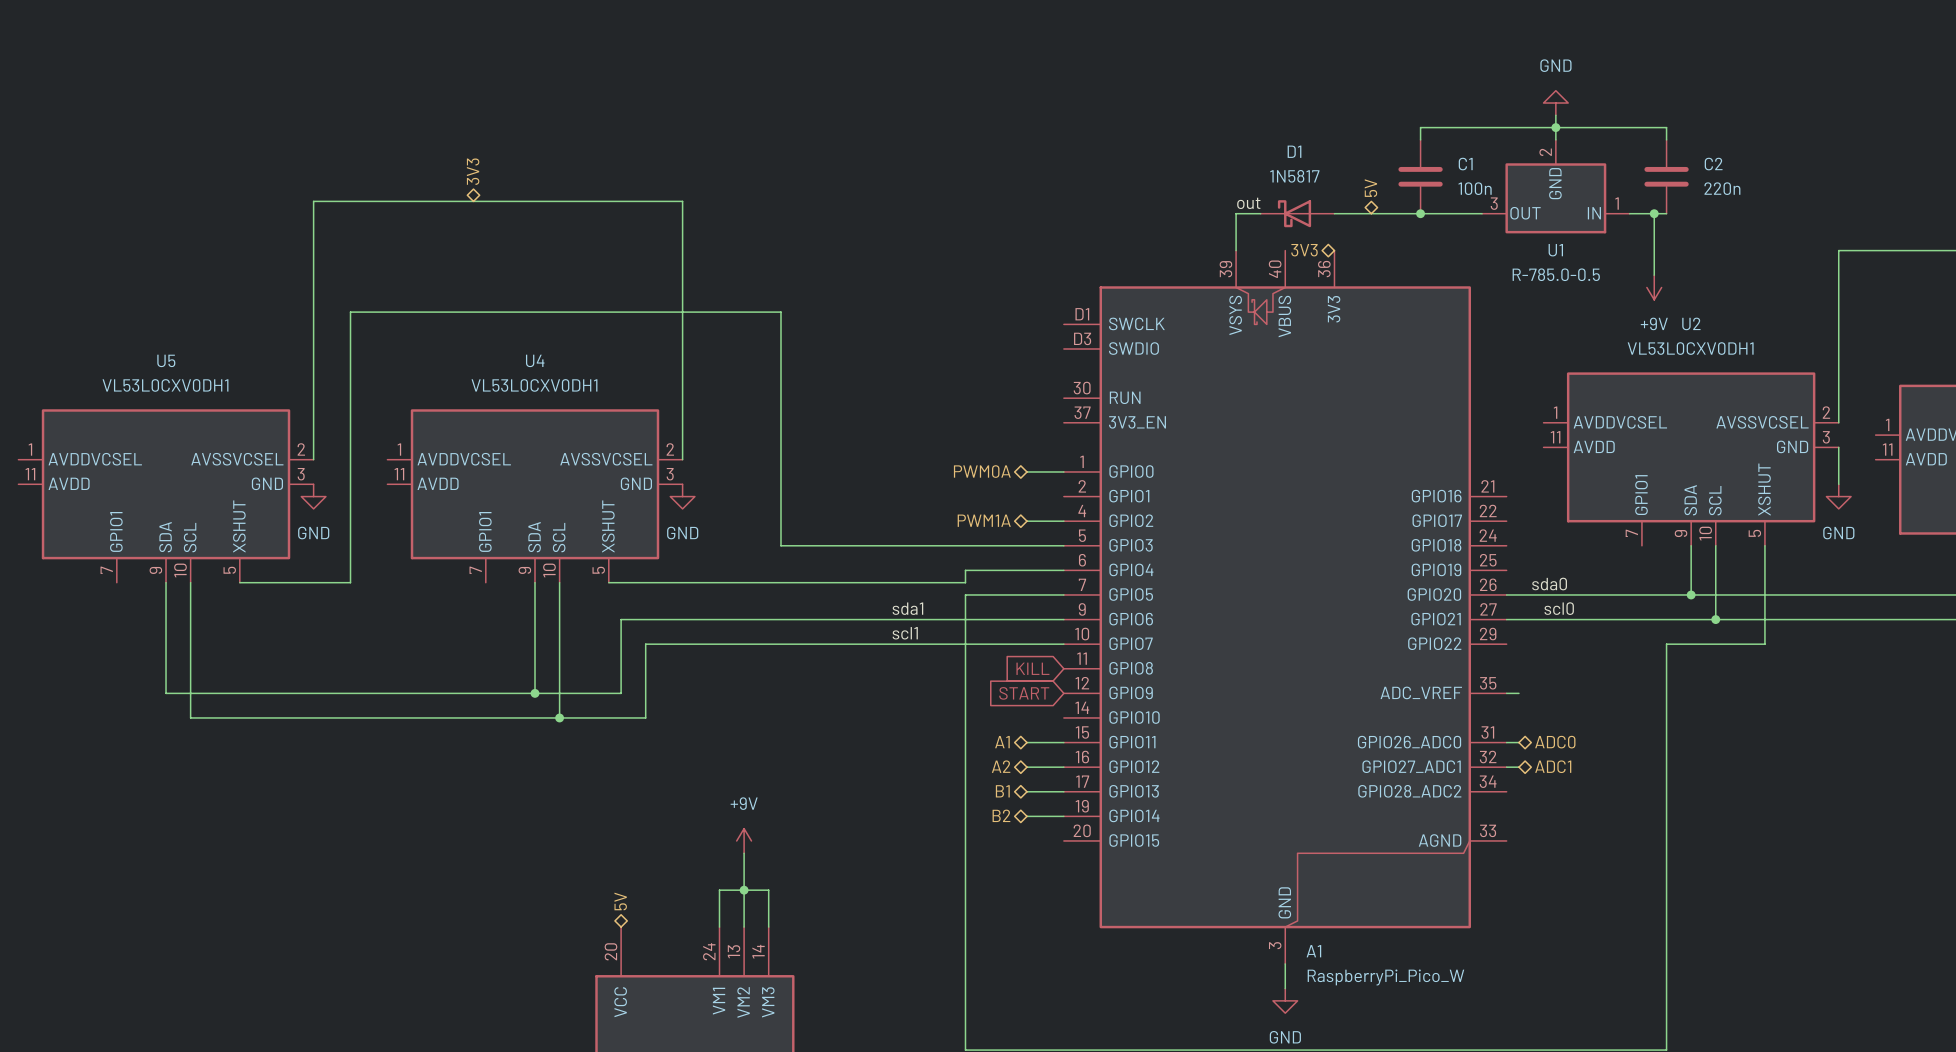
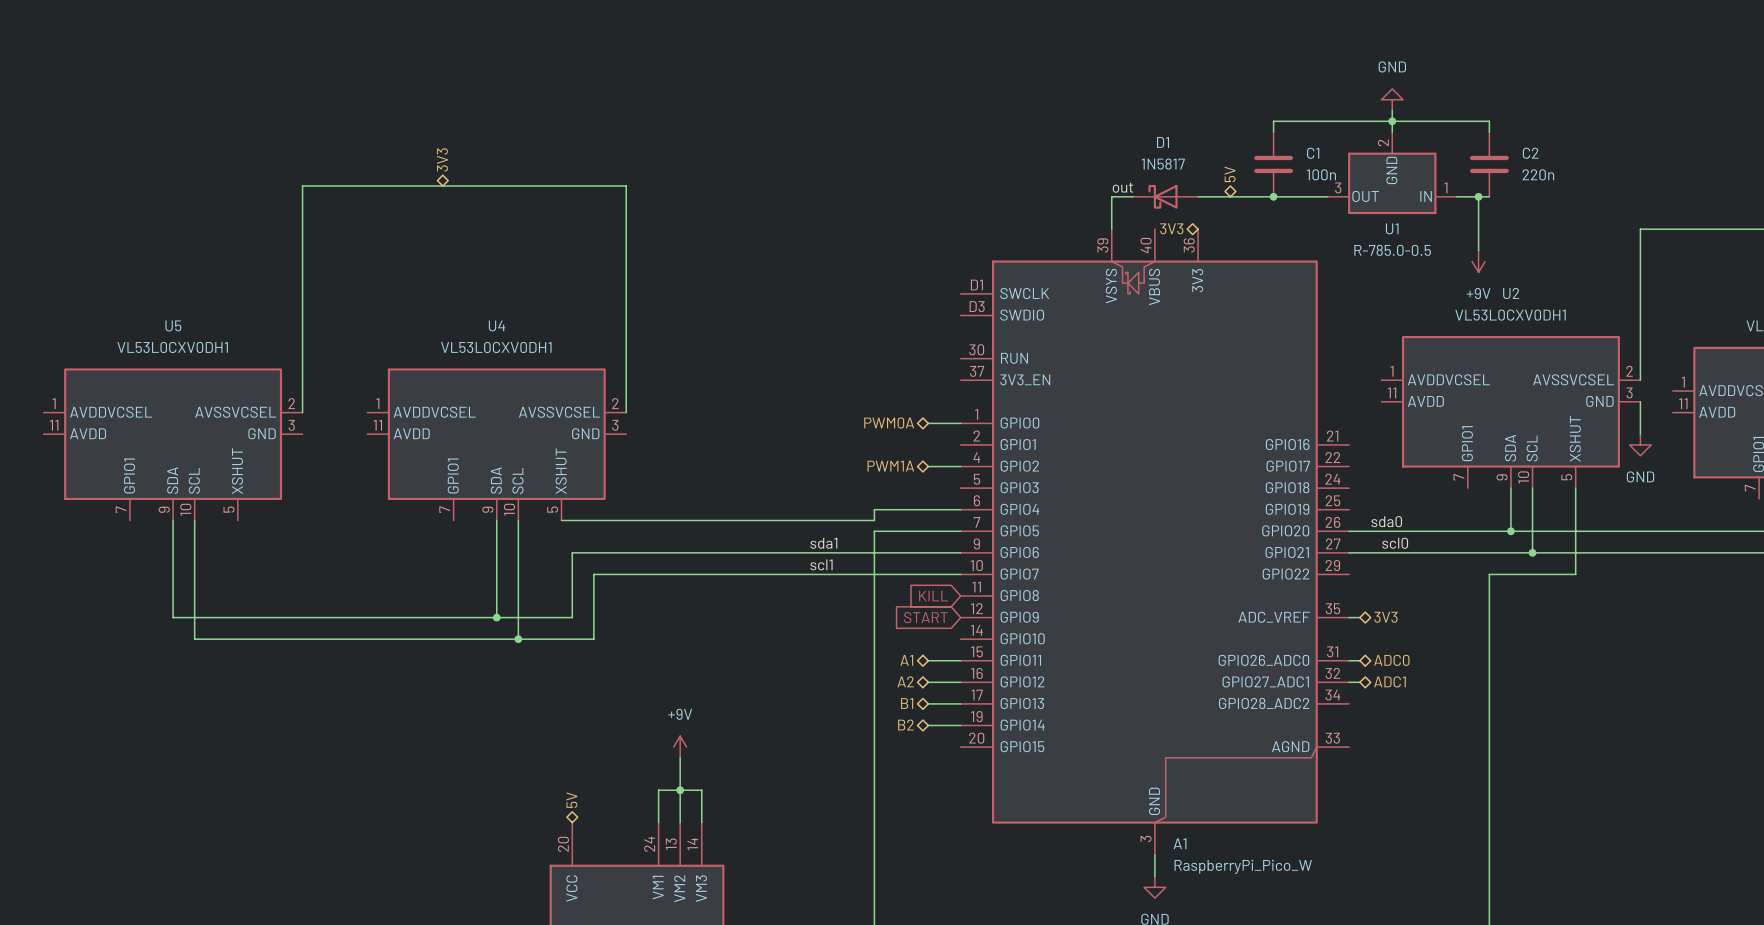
power symbol: GND (313, 496) -> none
power symbol: GND (682, 496) -> none
wire: (1063, 545) (780, 545) (780, 312) (350, 312) (350, 582) (239, 582) -> none
hierarchical label: none -> 3V3 (1385, 617)

